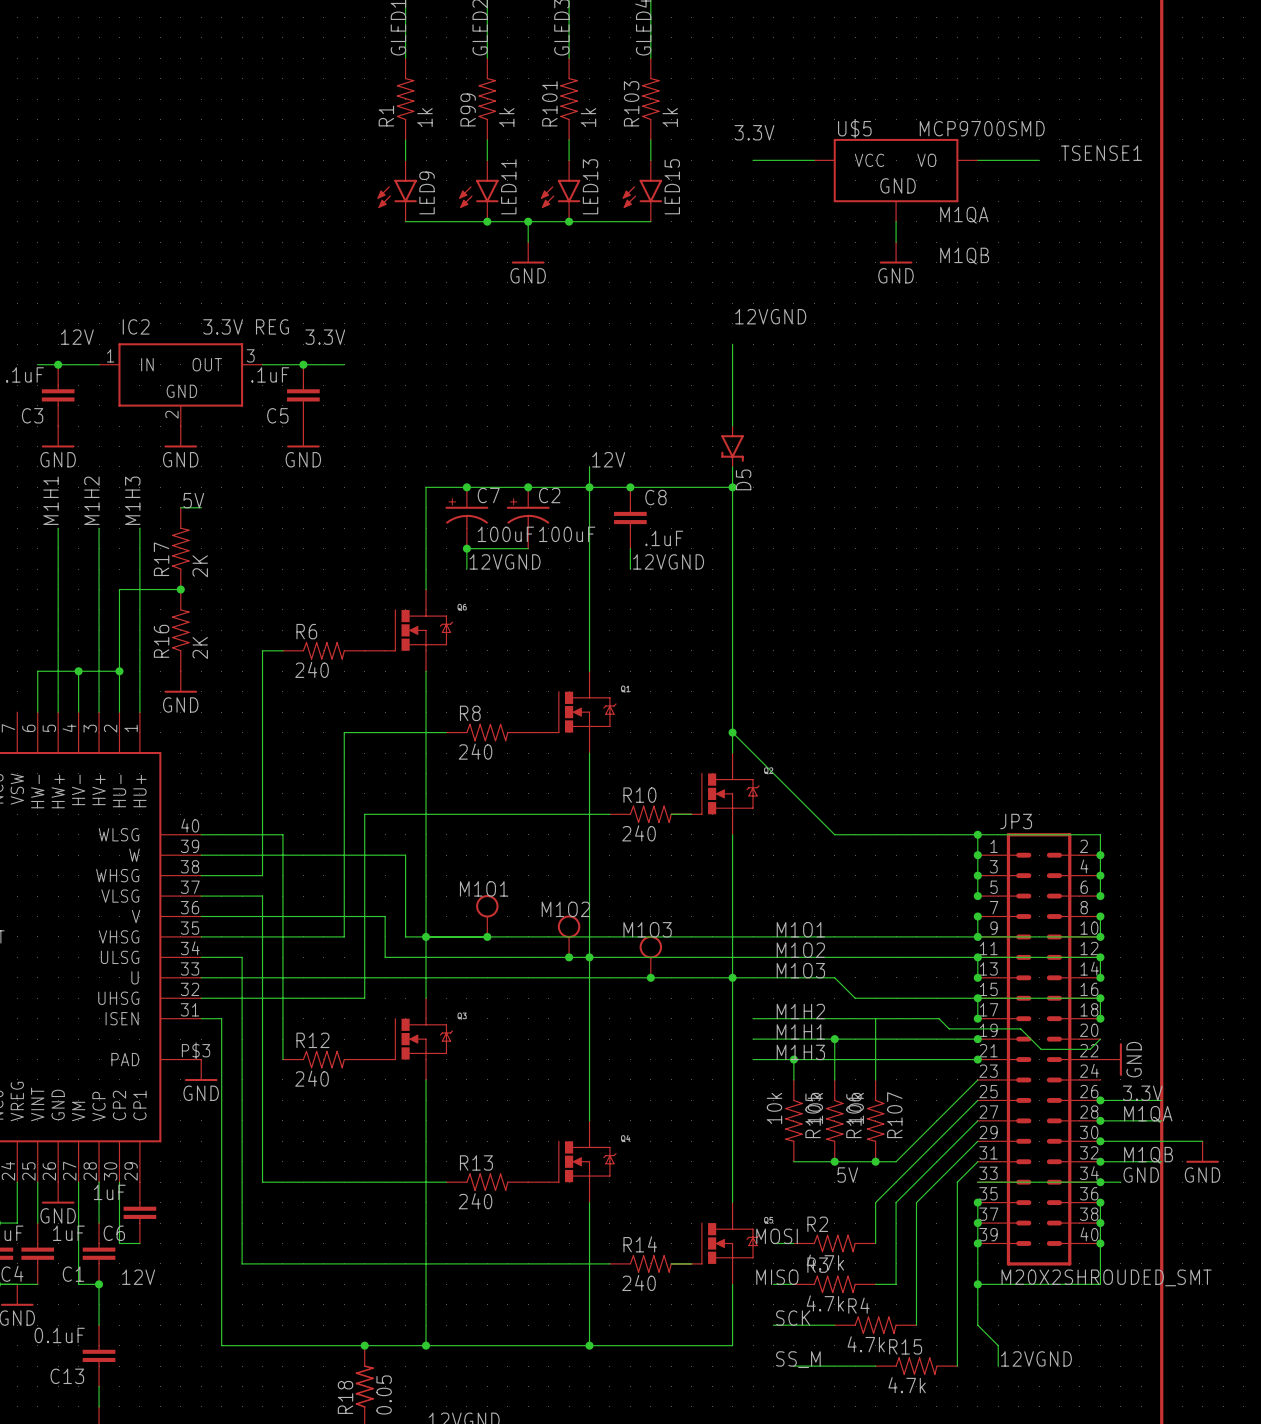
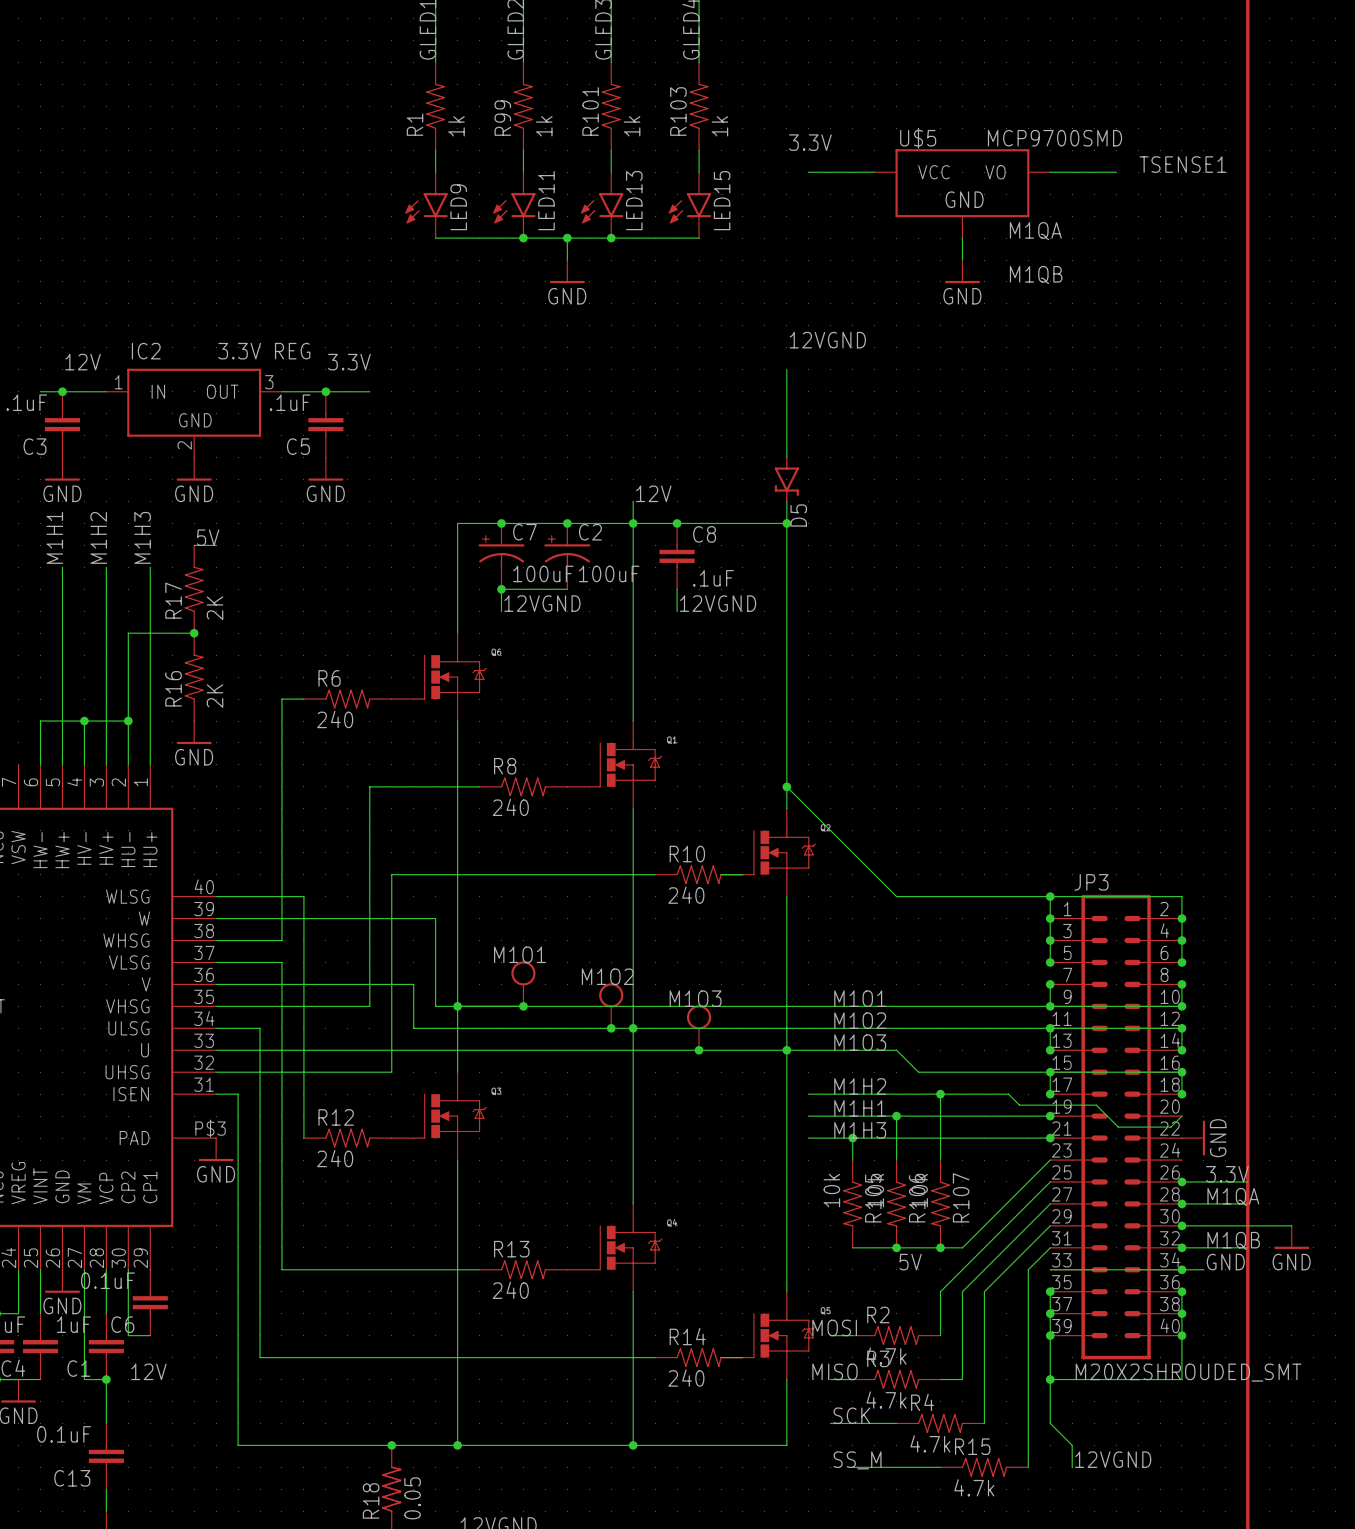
junction: none -> (940, 1094)
C6 value: 1uF (109, 1192) -> 0.1uF (107, 1280)

